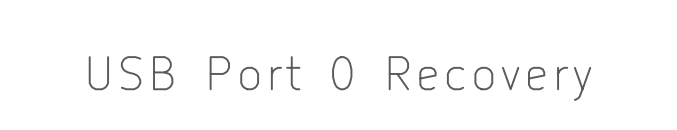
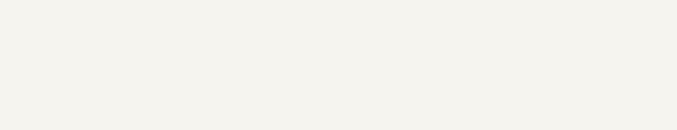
text: USB Port 0 Recovery (339, 78) -> none

